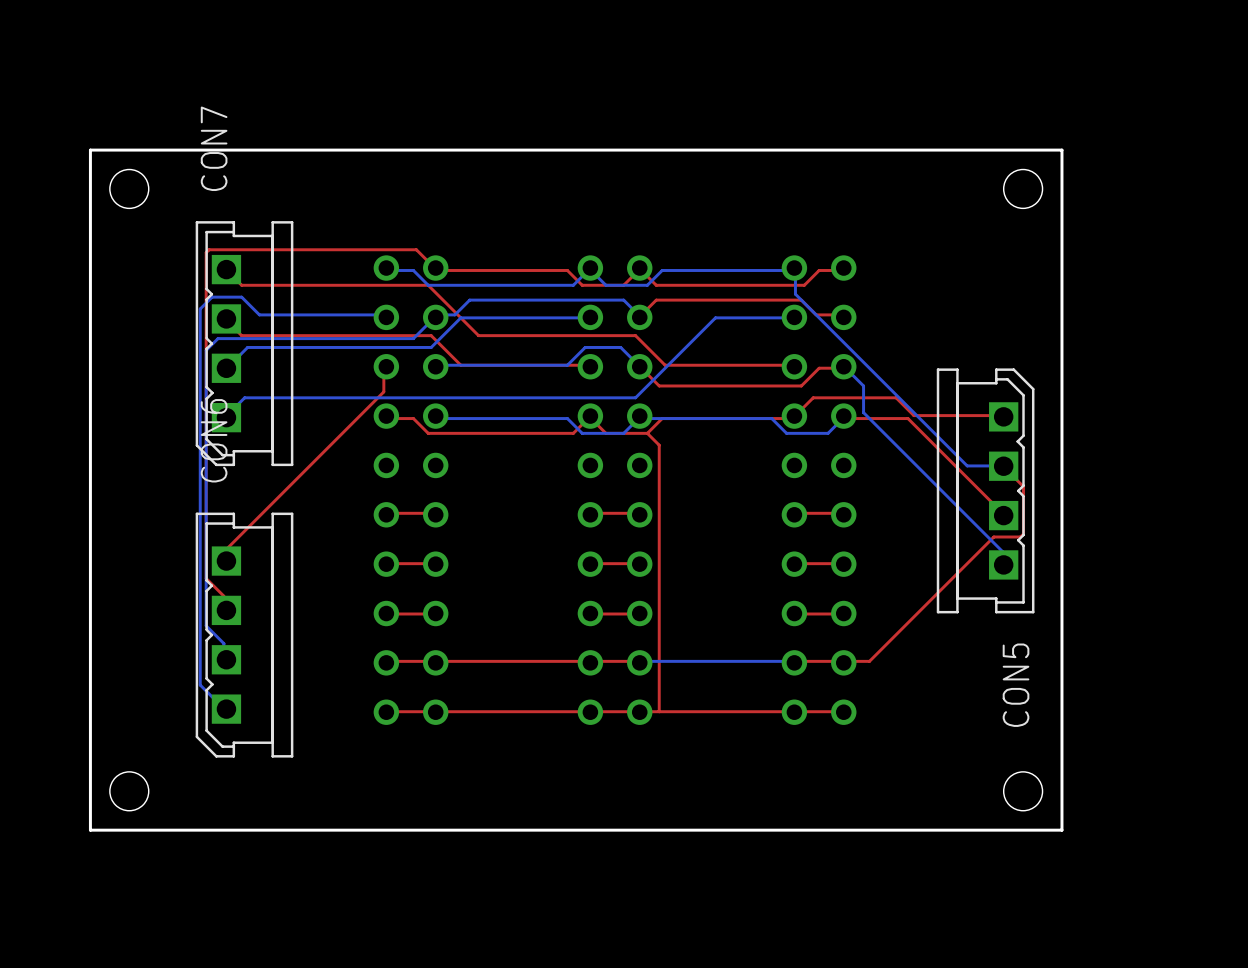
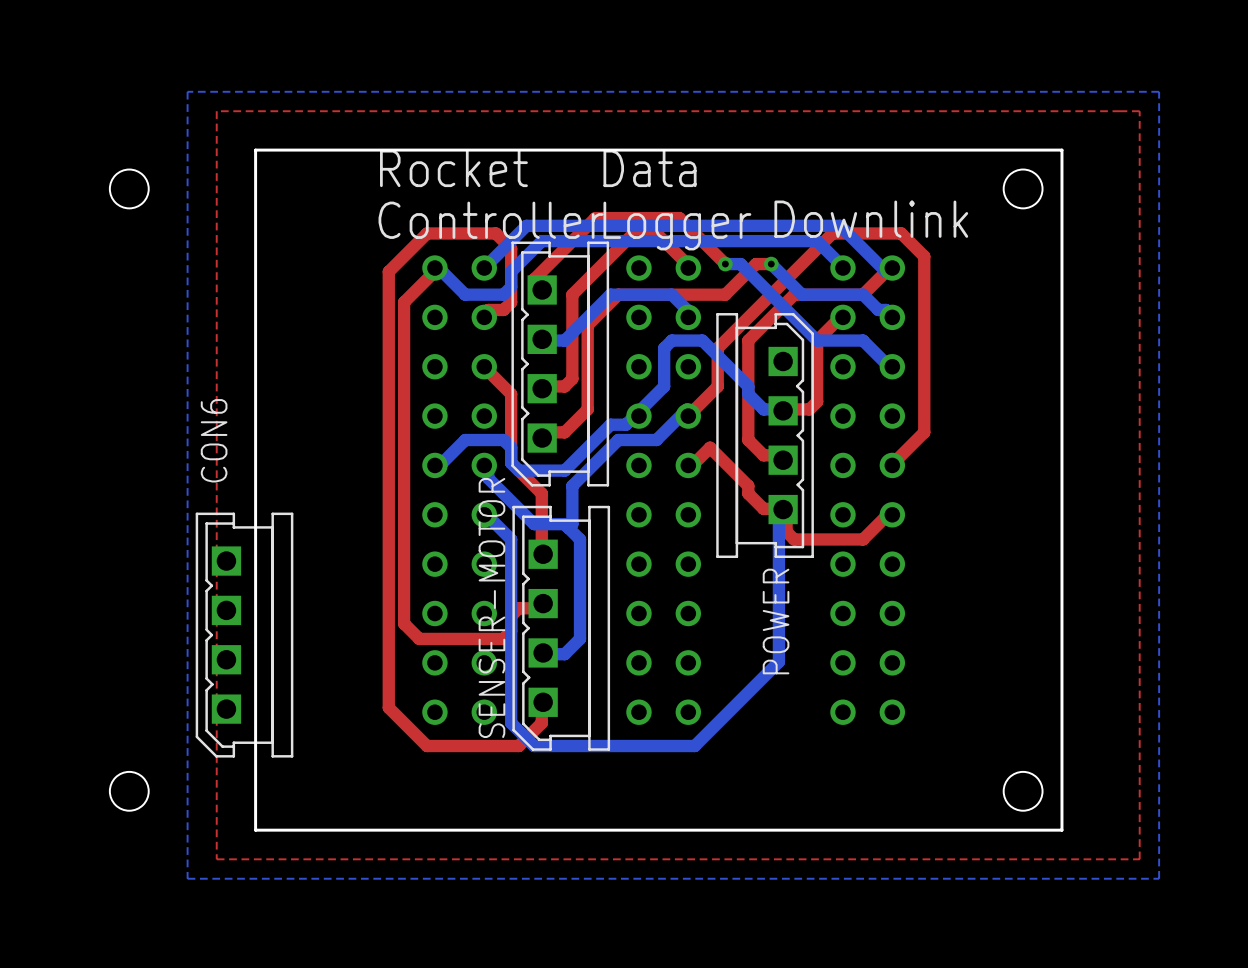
bottom zone outline: none -> (1159, 91) (187, 91) (187, 878) (1159, 878) (1159, 91)
top zone outline: none -> (1139, 111) (216, 111) (216, 859) (1139, 859) (1139, 111)
board edge: (255, 150) (90, 150) (90, 830) (255, 830) -> (255, 150) (255, 830)
text: none -> Rocket (453, 168)
text: none -> Data (650, 168)
text: none -> Downlink (871, 219)
text: none -> Controller (490, 220)
text: none -> Logger (677, 226)
top track: none -> (725, 264) (679, 218) (595, 218) (534, 279) (534, 287) (541, 294) (542, 289)
bottom track: none -> (725, 264) (740, 264) (817, 340) (863, 340) (886, 363) (892, 366)
via: none -> (725, 264)
top track: none -> (771, 264) (755, 264) (725, 294) (618, 294) (587, 325) (587, 409) (564, 432) (549, 432) (542, 438)
bottom track: none -> (771, 264) (801, 294) (863, 294) (878, 309) (886, 309) (892, 317)
via: none -> (771, 264)
bottom track: (386, 268) (386, 270) (413, 270) (428, 285) (573, 285) (590, 268) (605, 285) (647, 285) (662, 270) (792, 270) (794, 268) (795, 294) (967, 465) (1003, 466) -> none
top track: none -> (434, 268) (434, 271) (404, 302) (404, 623) (419, 638) (503, 638) (511, 631) (511, 615) (518, 608) (541, 608) (543, 603)
top track: none -> (688, 268) (687, 264) (656, 233) (633, 233) (572, 294) (572, 378) (564, 386) (549, 386) (542, 388)
bottom track: none -> (842, 268) (817, 241) (541, 241) (511, 271) (511, 287) (503, 294) (465, 294) (442, 271) (434, 268)
top track: (843, 268) (842, 270) (819, 270) (804, 285) (656, 285) (639, 268) (623, 285) (582, 285) (567, 270) (437, 270) (416, 249) (209, 249) (206, 252) (206, 578) (223, 596) (223, 608) (226, 610) -> none
top track: none -> (892, 268) (886, 271) (863, 294) (794, 294) (748, 340) (748, 440) (763, 455) (778, 455) (783, 460)
bottom track: none -> (892, 268) (886, 271) (840, 225) (526, 225) (484, 268)
top track: (226, 269) (241, 285) (428, 285) (478, 335) (635, 335) (665, 365) (794, 366) -> none
bottom track: (386, 317) (383, 314) (259, 314) (241, 297) (212, 297) (200, 308) (200, 685) (226, 709) -> none
top track: none -> (484, 317) (488, 309) (503, 309) (511, 302) (511, 248) (495, 233) (427, 233) (388, 271) (388, 707) (427, 746) (518, 746) (541, 723) (543, 702)
bottom track: (590, 317) (460, 317) (431, 347) (247, 347) (226, 368) -> none
bottom track: (639, 317) (623, 300) (469, 300) (454, 314) (437, 314) (413, 338) (218, 338) (206, 350) (206, 625) (223, 643) (223, 658) (226, 659) -> none
bottom track: none -> (688, 317) (687, 309) (671, 294) (610, 294) (564, 340) (542, 339)
bottom track: (794, 317) (715, 317) (635, 397) (244, 397) (226, 417) -> none
top track: (843, 317) (842, 314) (816, 314) (801, 300) (656, 300) (639, 317) -> (842, 317) (840, 317) (817, 340) (817, 401) (809, 409) (783, 410)
top track: (226, 318) (241, 335) (431, 335) (460, 365) (590, 366) -> none
CON7: (244, 343) -> none
part: none -> (560, 364)
top track: (386, 366) (383, 368) (383, 391) (226, 548) (226, 561) -> none
top track: none -> (484, 366) (511, 394) (511, 462) (541, 493) (543, 554)
bottom track: (639, 366) (620, 347) (585, 347) (567, 365) (435, 366) -> none
top track: (843, 366) (819, 368) (801, 385) (659, 385) (639, 366) -> none
bottom track: (843, 366) (863, 385) (863, 412) (1002, 551) (1003, 564) -> none
bottom track: none -> (783, 410) (763, 409) (748, 394) (748, 386) (702, 340) (671, 340) (664, 348) (664, 386) (641, 409) (638, 416) (633, 417) (625, 424) (610, 424) (564, 470) (518, 470) (511, 462) (511, 447) (503, 440) (465, 440) (442, 462) (434, 465)
top track: (386, 416) (386, 418) (413, 418) (428, 433) (573, 433) (590, 416) (605, 433) (647, 433) -> none
top track: none -> (688, 416) (717, 386) (717, 348) (832, 233) (901, 233) (924, 256) (924, 432) (892, 465)
bottom track: none -> (688, 416) (687, 409) (656, 440) (618, 440) (572, 485) (572, 524) (568, 527)
top track: (843, 416) (845, 418) (907, 418) (1003, 515) -> none
bottom track: (843, 416) (828, 433) (786, 433) (771, 418) (641, 418) (639, 416) (623, 433) (582, 433) (567, 418) (437, 418) (435, 416) -> none
top track: (1003, 416) (913, 415) (896, 397) (813, 397) (792, 418) (662, 418) (647, 433) -> none
top track: (647, 433) (659, 445) (659, 711) -> none
POWER: none -> (765, 435)
bottom track: none -> (484, 465) (488, 470) (488, 478) (534, 524) (564, 524) (580, 539) (580, 638) (564, 654) (543, 652)
top track: none -> (688, 465) (694, 462) (710, 447) (748, 485) (748, 493) (763, 508) (783, 509) (786, 516) (786, 531) (794, 539) (863, 539) (886, 516) (892, 514)
top track: (1003, 466) (1023, 486) (1023, 534) (1020, 537) (993, 537) (869, 661) (794, 662) -> none
part position: (411, 490) -> (459, 490)
part position: (615, 490) -> (663, 490)
part position: (819, 490) -> (867, 490)
CON5: (985, 490) -> none
bottom track: none -> (783, 509) (778, 516) (778, 661) (694, 746) (534, 746) (511, 723) (511, 539) (484, 514)
top track: (435, 514) (386, 514) -> none
top track: (639, 514) (590, 514) -> none
top track: (843, 514) (794, 514) -> none
top track: (435, 564) (386, 564) -> none
top track: (639, 564) (590, 564) -> none
top track: (843, 564) (794, 564) -> none
top track: (435, 613) (386, 613) -> none
top track: (639, 613) (590, 613) -> none
top track: (843, 613) (794, 613) -> none
SENSER-MOTOR: none -> (561, 628)
top track: (639, 662) (386, 662) -> none
bottom track: (794, 662) (639, 662) -> none
top track: (843, 712) (386, 712) -> none

